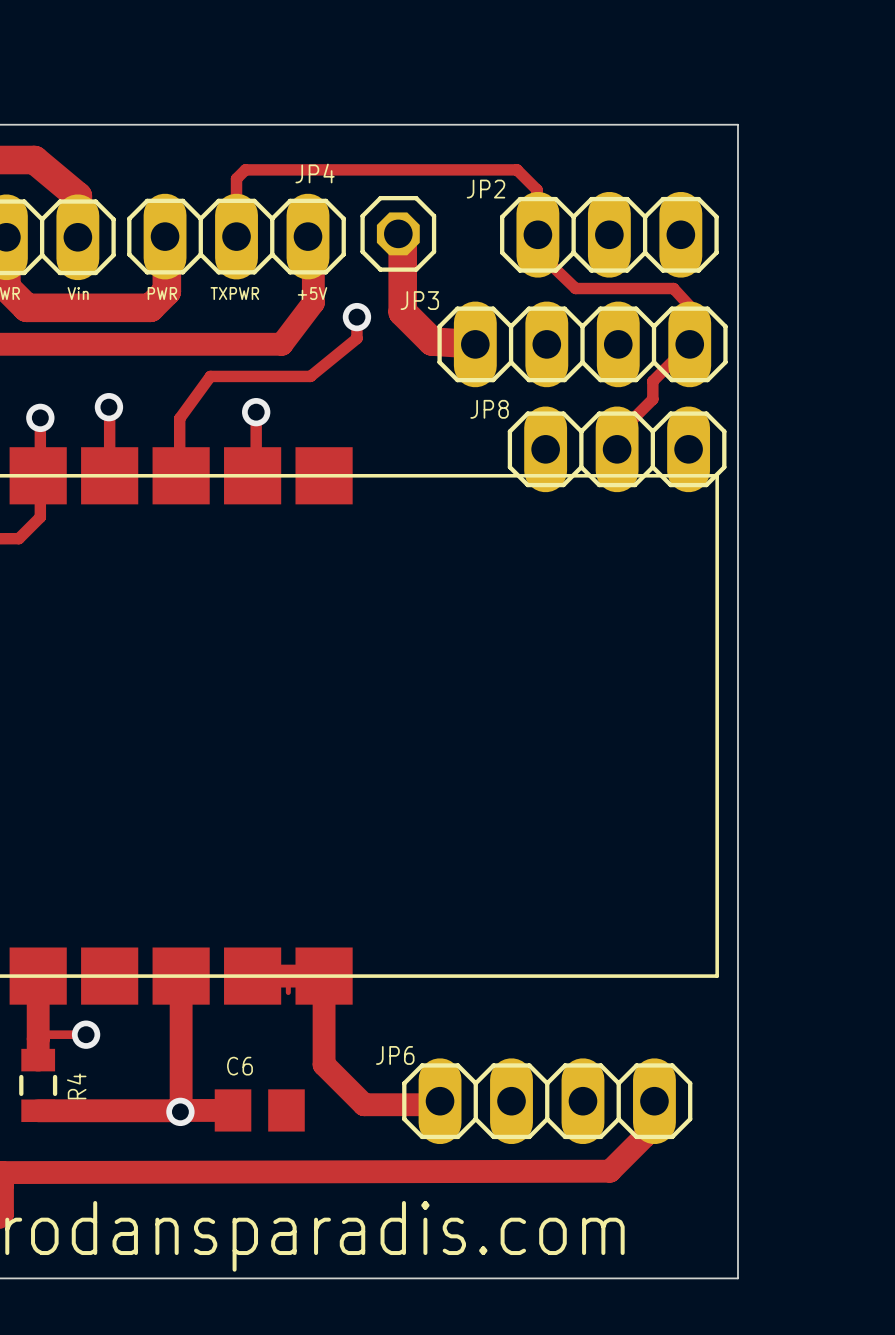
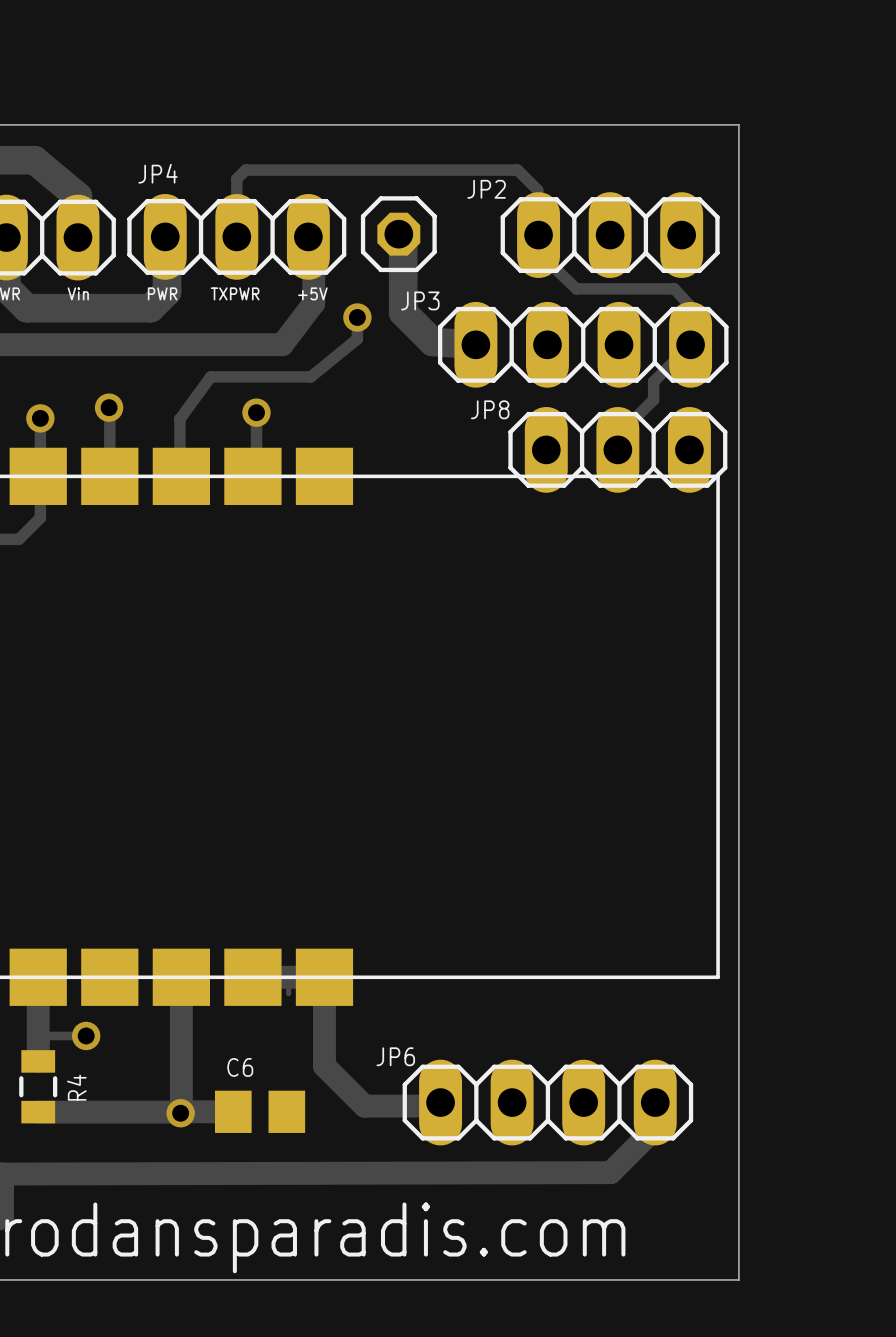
JP4 name position: JP4 (315, 173) -> JP4 (158, 173)

